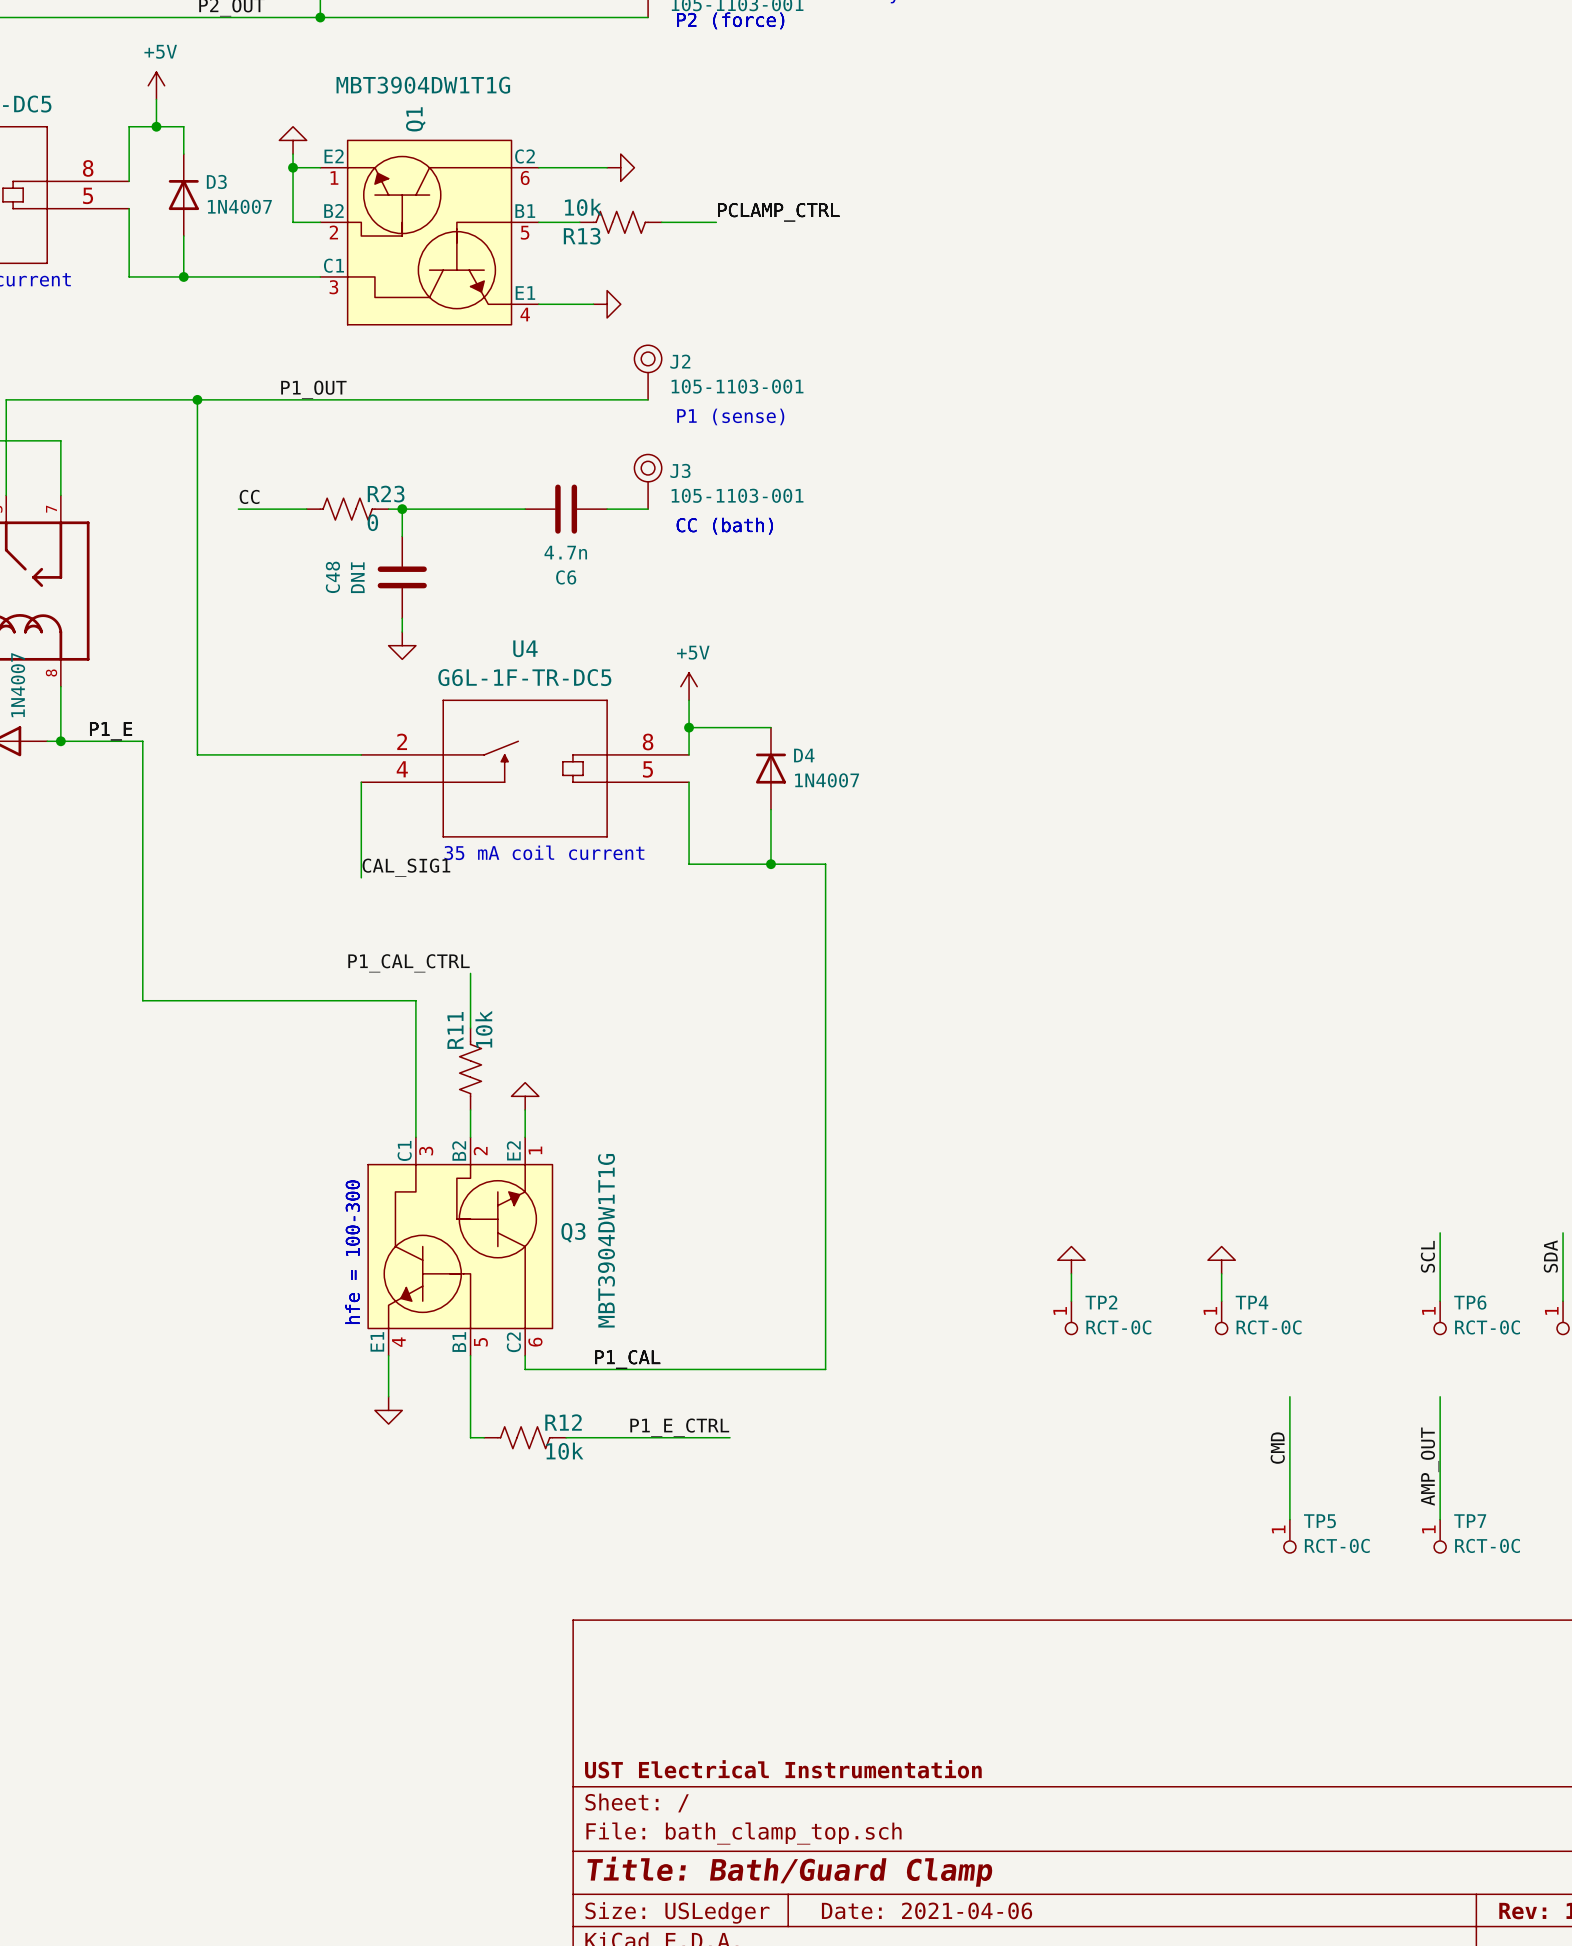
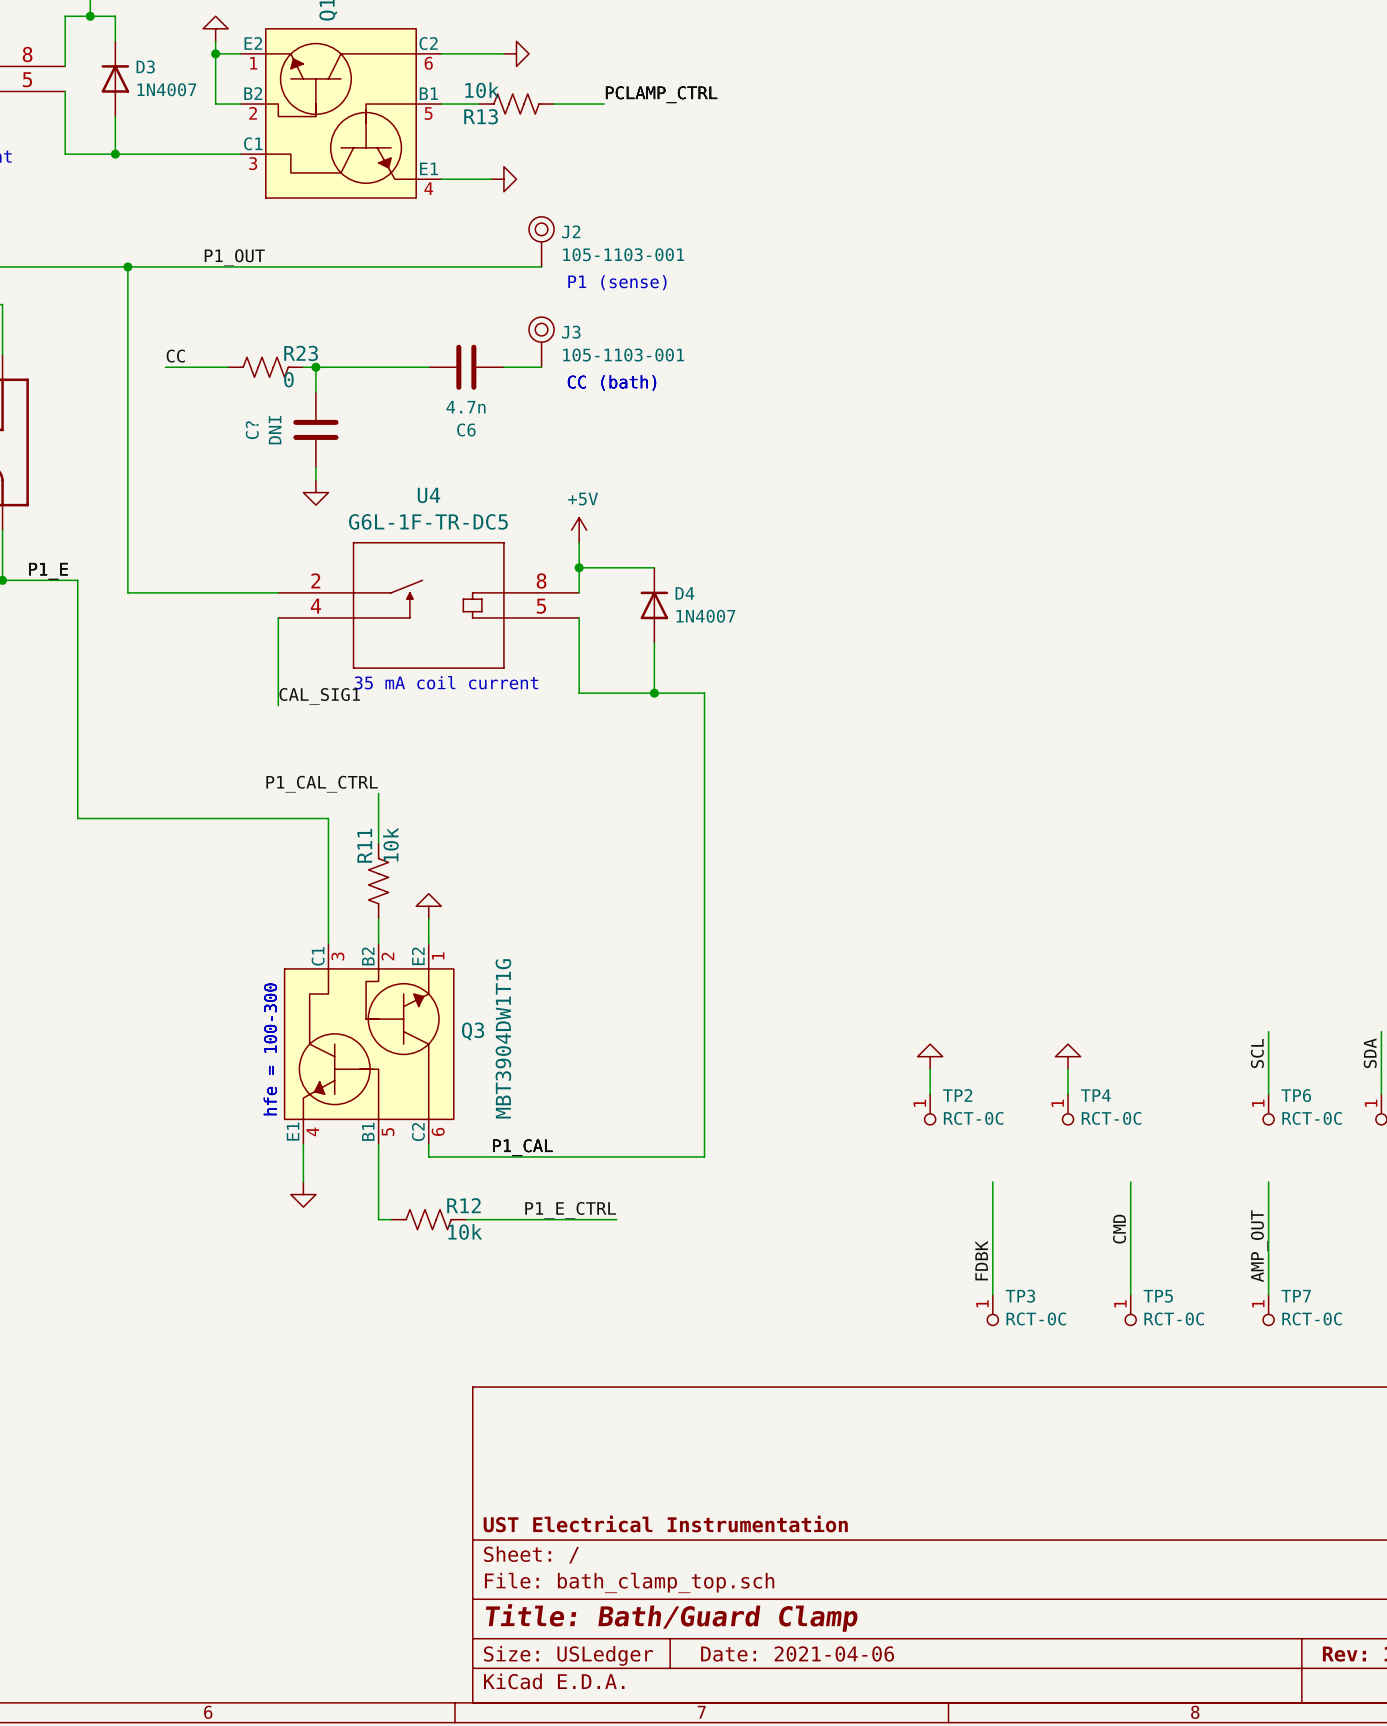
C48 name: C48 (332, 577) -> C? (252, 430)
wire: none -> (992, 1182) (992, 1294)
label: none -> FDBK (981, 1260)
TP3: none -> RCT-0C (992, 1310)

